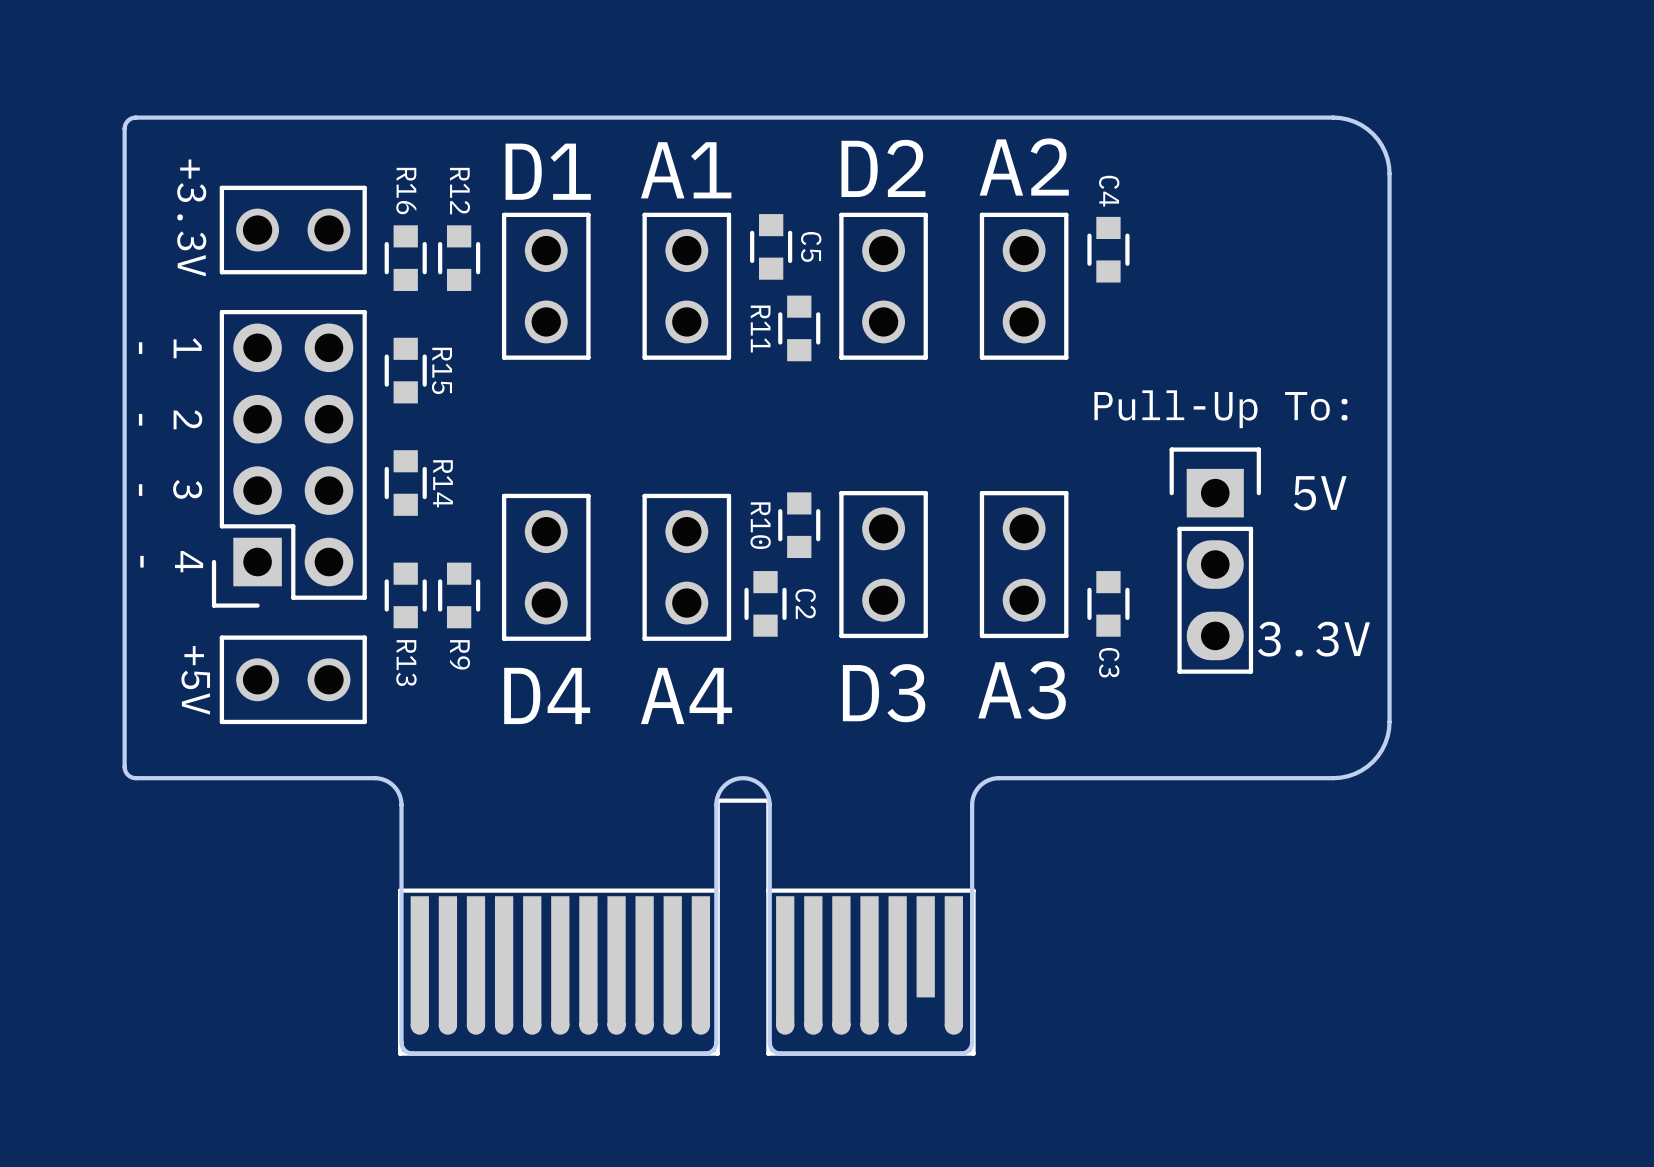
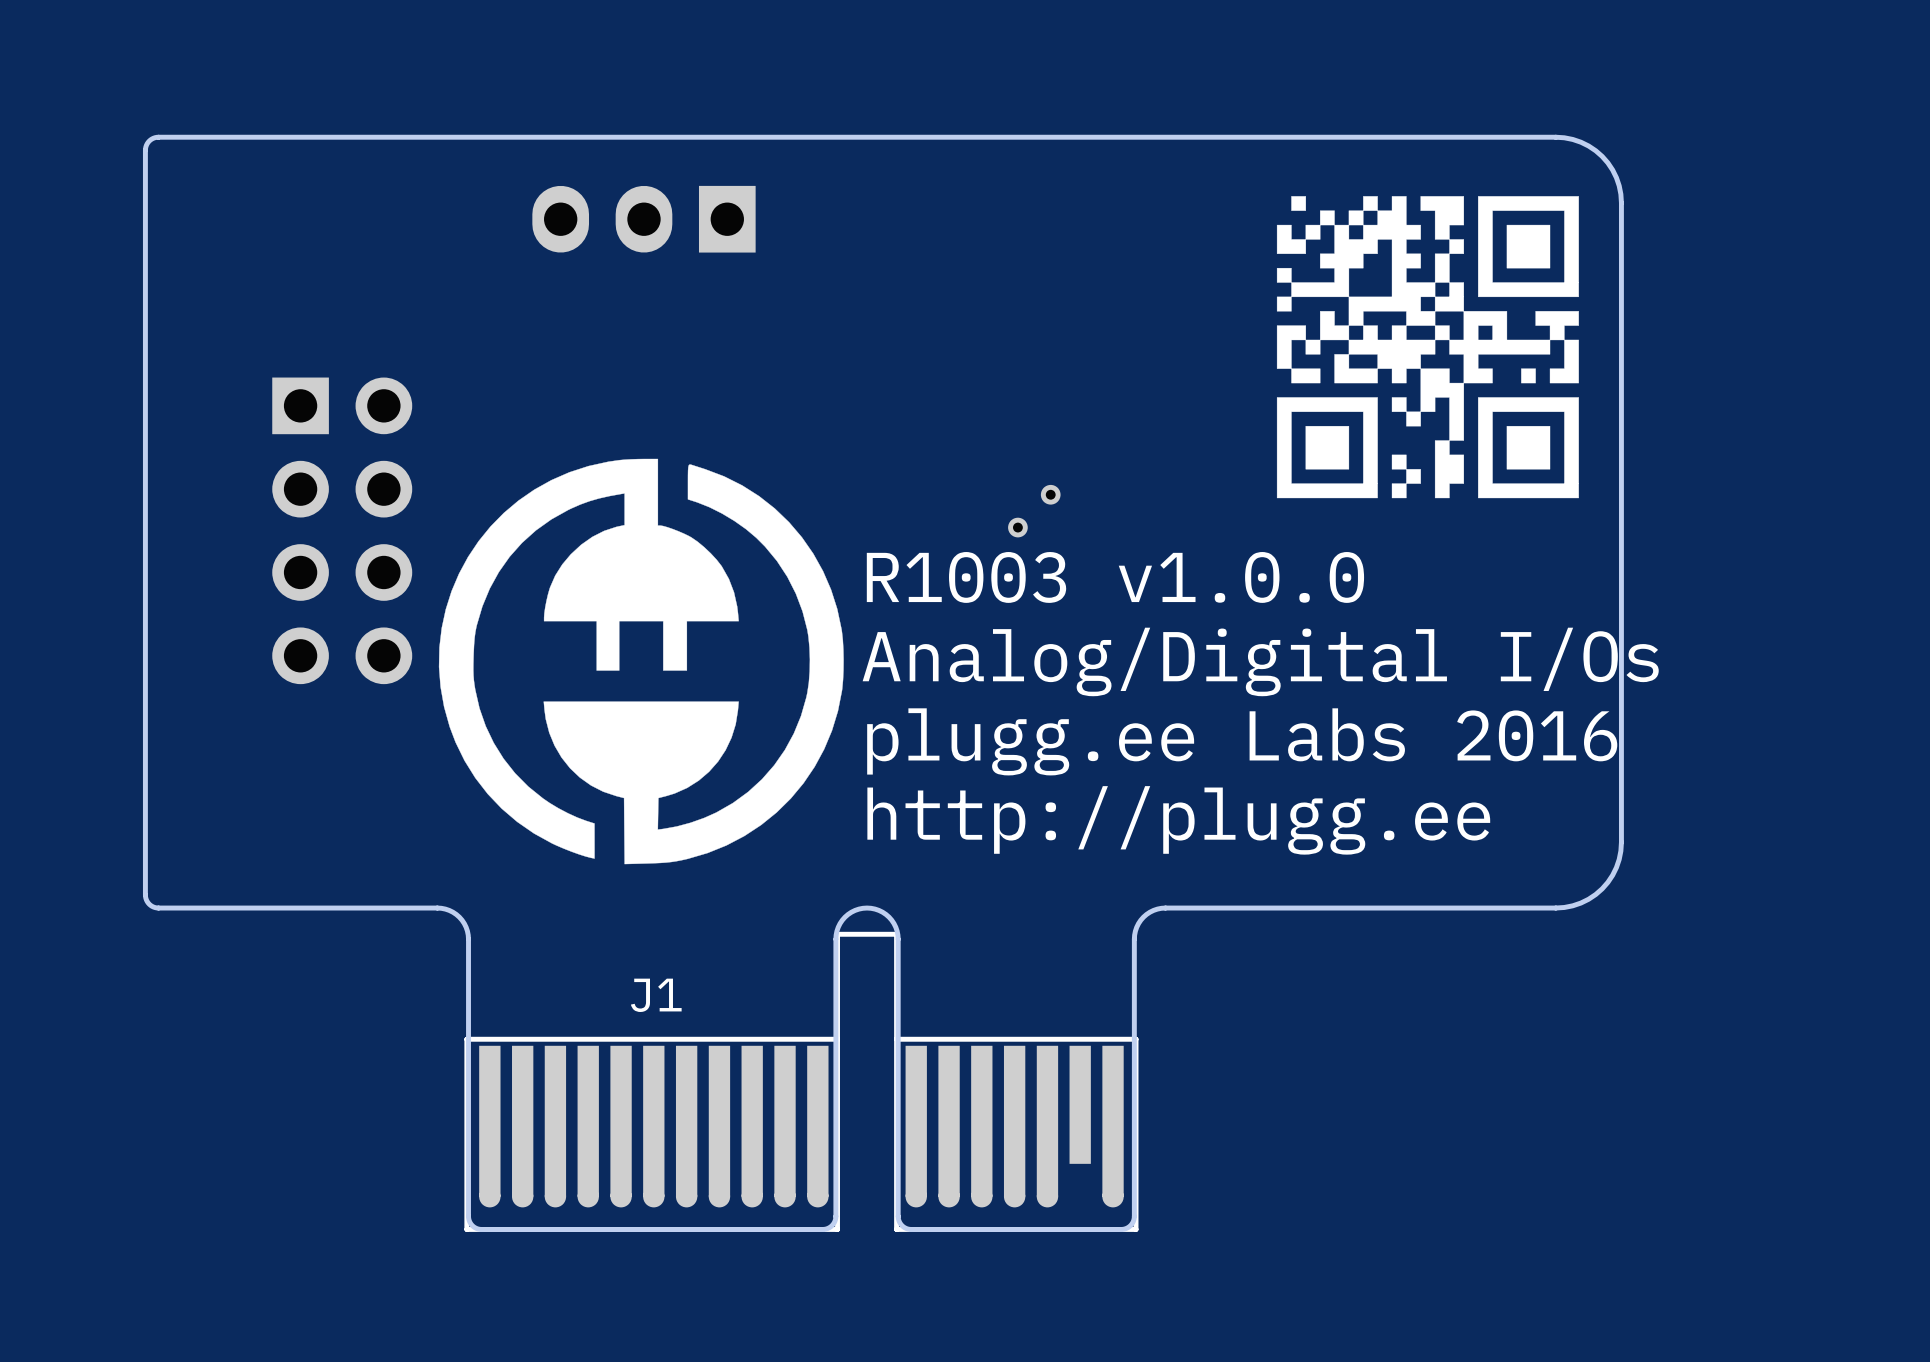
text: A2 (1024, 167) -> none
text: D2 (883, 168) -> none
drawing: none -> [1276, 196, 1579, 499]
text: A1 (686, 170) -> none
text: D1 (548, 171) -> none
part: none -> (643, 219)
text: +3.3V (191, 217) -> none
part: (293, 230) -> none
C5: (771, 246) -> none
C4: (1108, 249) -> none
R16: (405, 258) -> none
R12: (459, 258) -> none
part: (546, 286) -> none
part: (686, 286) -> none
part: (883, 286) -> none
part: (1024, 286) -> none
R11: (799, 328) -> none
text: - (140, 348) -> none
text: 1 (187, 348) -> none
R15: (405, 370) -> none
drawing: none -> [438, 458, 844, 865]
text: Pull-Up To: (1220, 409) -> none
text: - (140, 419) -> none
text: 2 (187, 419) -> none
part: none -> (1034, 511)
part side: bottom (289, 458) -> top (342, 530)
R14: (405, 483) -> none
text: 3 (187, 489) -> none
text: - (140, 490) -> none
text: 5V (1320, 493) -> none
text: none -> R1003 v1.0.0 (1115, 577)
R10: (799, 525) -> none
part: (1215, 560) -> none
text: - (142, 561) -> none
text: 4 (189, 561) -> none
part: (883, 564) -> none
part: (1024, 564) -> none
part: (546, 567) -> none
part: (686, 567) -> none
text: none -> Analog/Digital I/Os (1260, 661)
R13: (405, 595) -> none
R9: (459, 595) -> none
C2: (765, 603) -> none
C3: (1108, 603) -> none
text: none -> plugg.ee Labs 2016 (1242, 741)
text: 3.3V (1313, 639) -> none
part: (293, 679) -> none
text: +5V (195, 680) -> none
text: A3 (1022, 690) -> none
text: D3 (884, 693) -> none
text: D4 (547, 695) -> none
text: A4 (686, 695) -> none
text: none -> http://plugg.ee (1178, 820)
J1 name: none -> J1 (656, 995)

